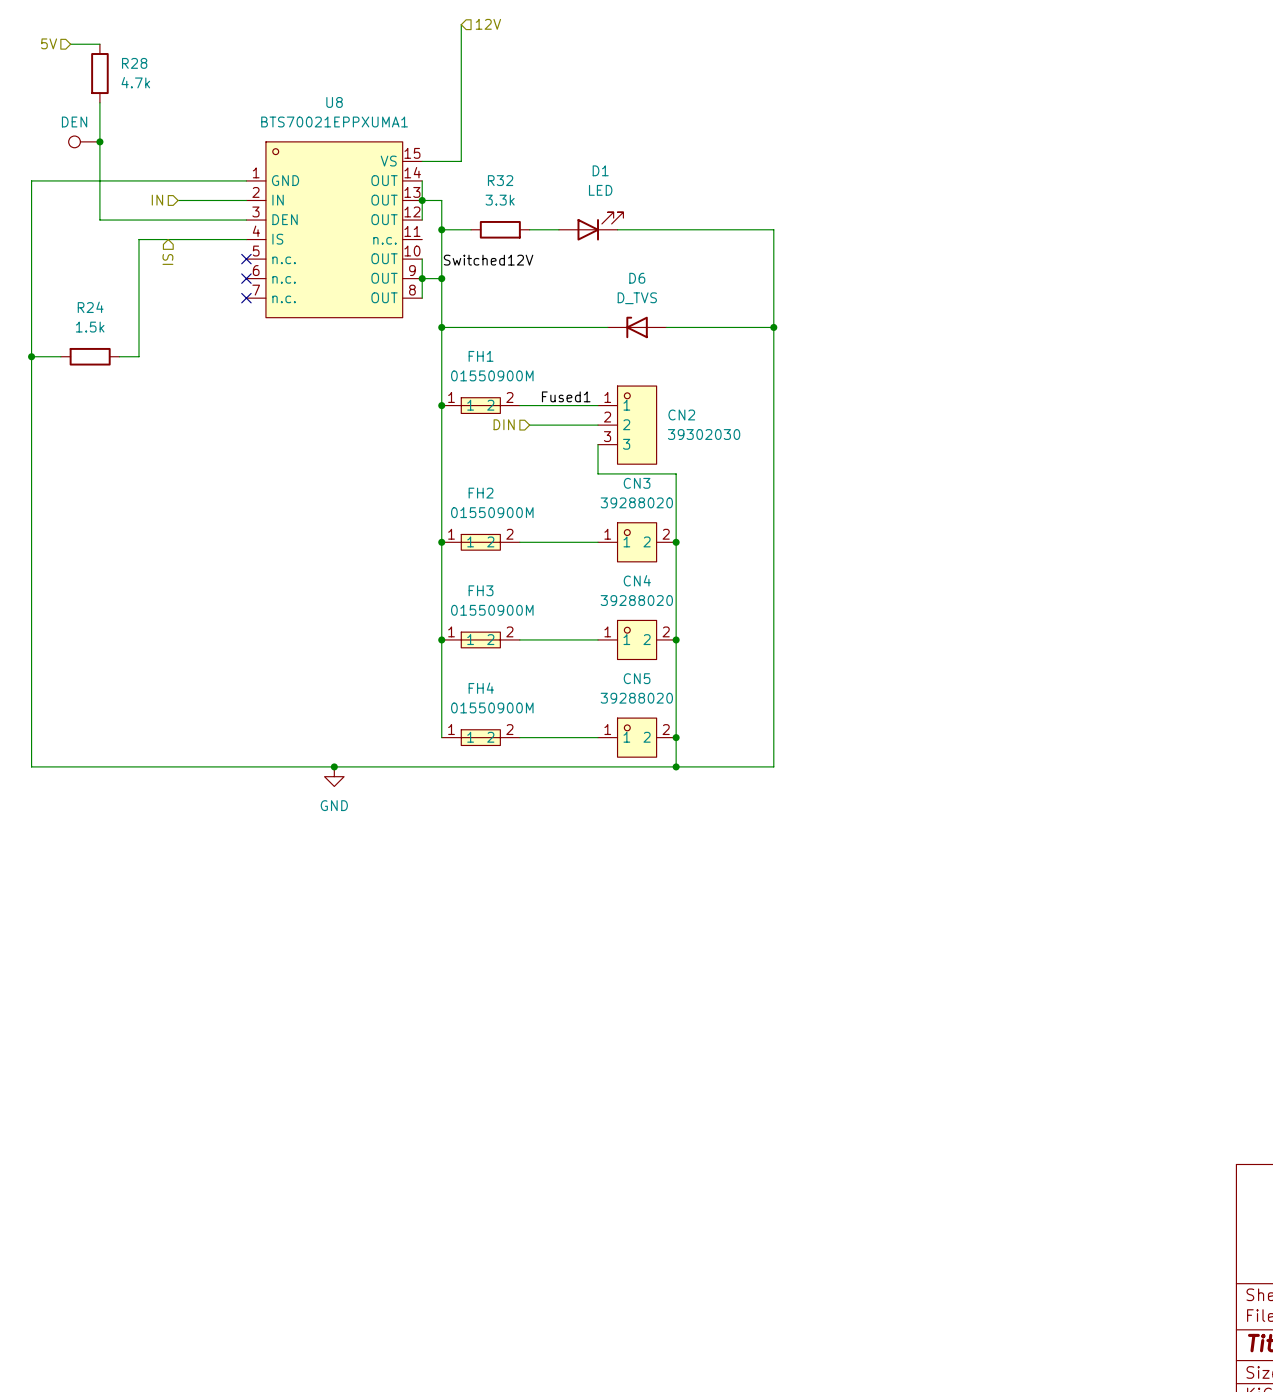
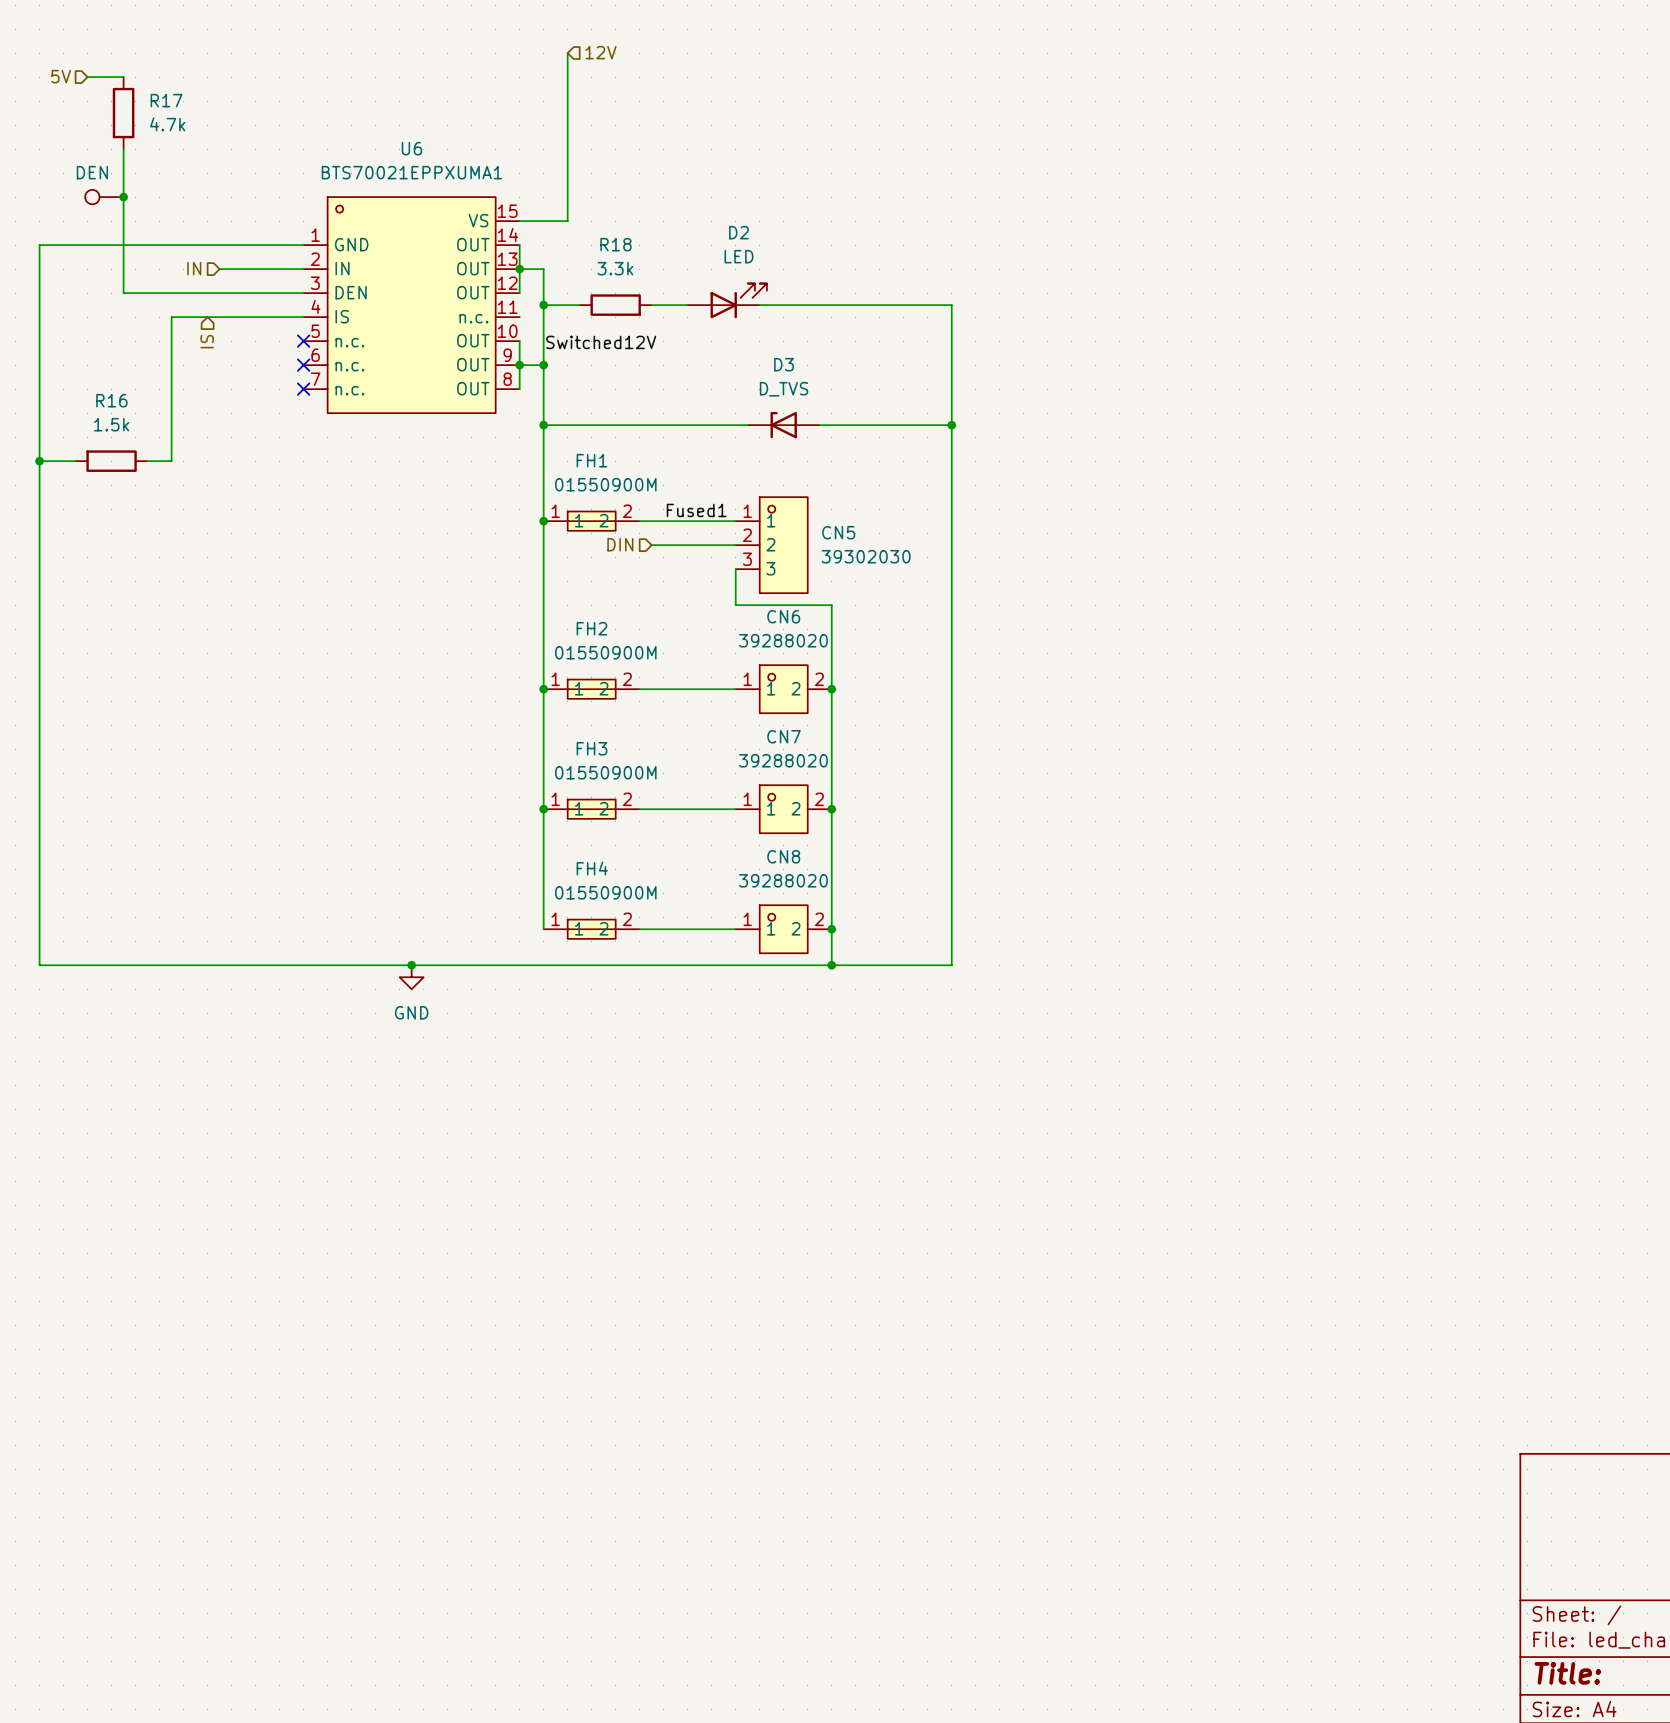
R28 name: R28 (134, 63) -> R17 (166, 100)
U8 name: U8 (334, 102) -> U6 (411, 148)
D1 name: D1 (600, 170) -> D2 (739, 232)
R32 name: R32 (500, 180) -> R18 (615, 244)
D6 name: D6 (637, 278) -> D3 (784, 364)
R24 name: R24 (90, 307) -> R16 (111, 400)
CN2 name: CN2 (681, 414) -> CN5 (838, 532)
CN3 name: CN3 (637, 483) -> CN6 (783, 616)
CN4 name: CN4 (637, 580) -> CN7 (784, 736)
CN5 name: CN5 (637, 678) -> CN8 (783, 856)

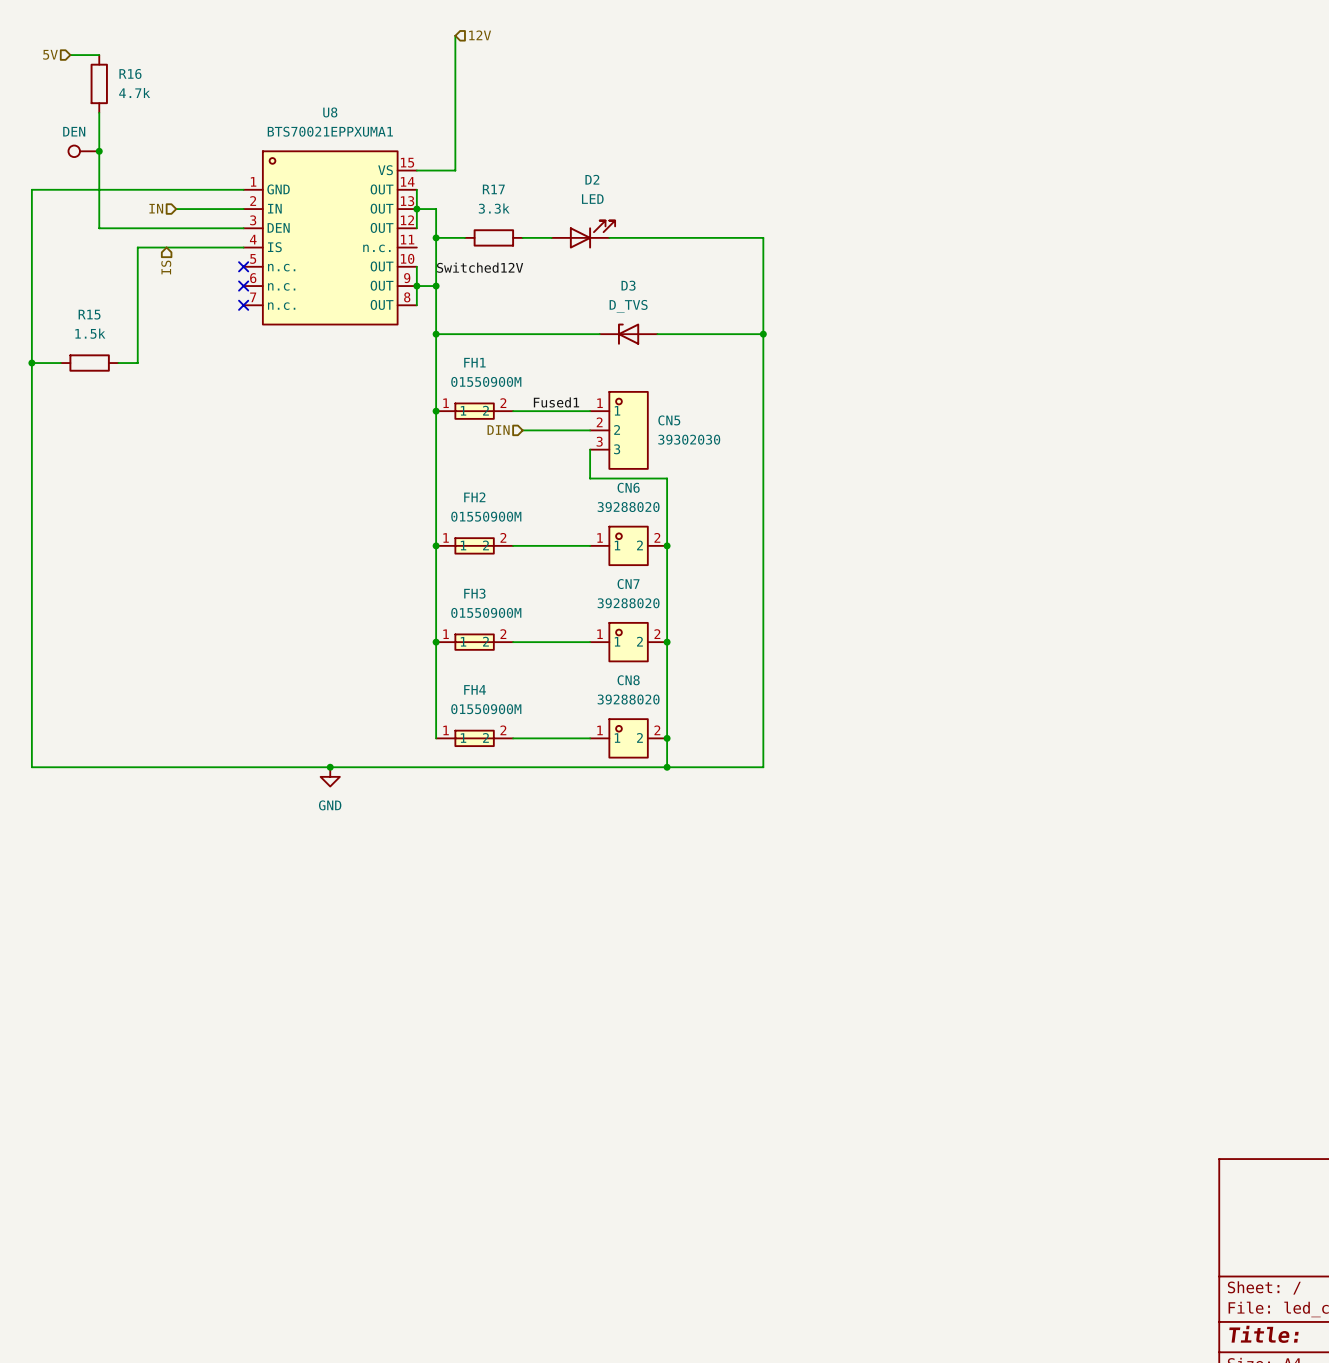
R17 name: R17 (166, 100) -> R16 (130, 73)
U6 name: U6 (411, 148) -> U8 (330, 112)
R18 name: R18 (615, 244) -> R17 (493, 189)
R16 name: R16 (111, 400) -> R15 (89, 314)

